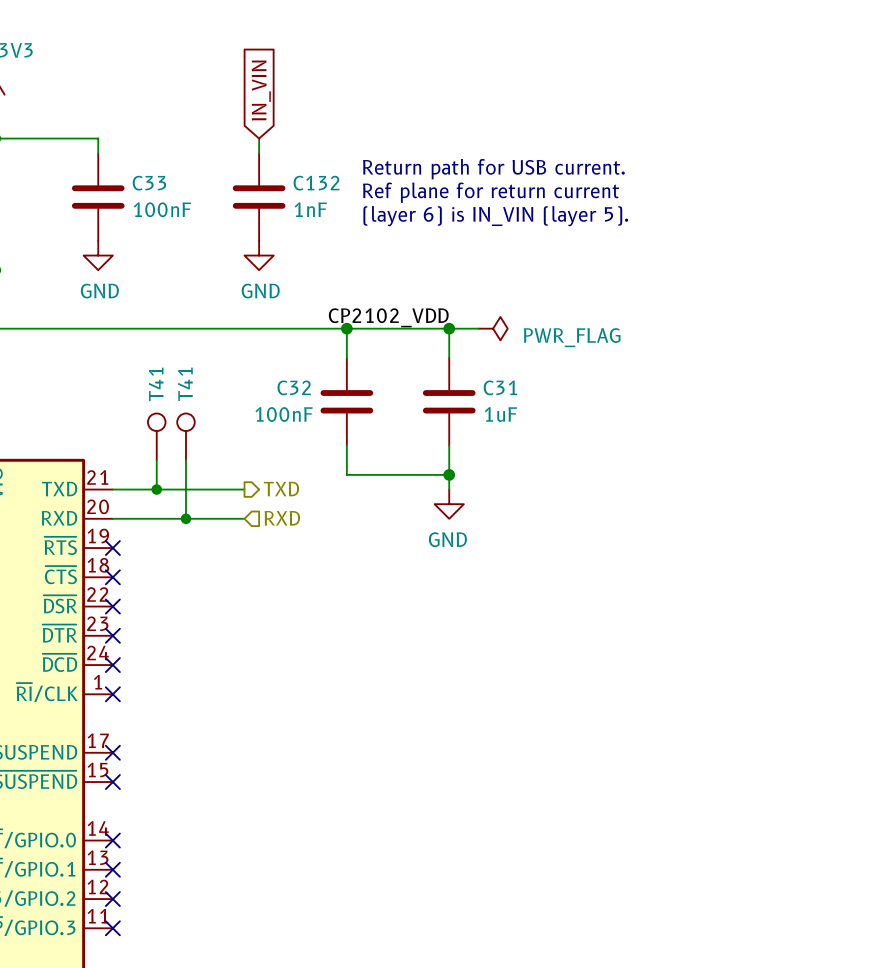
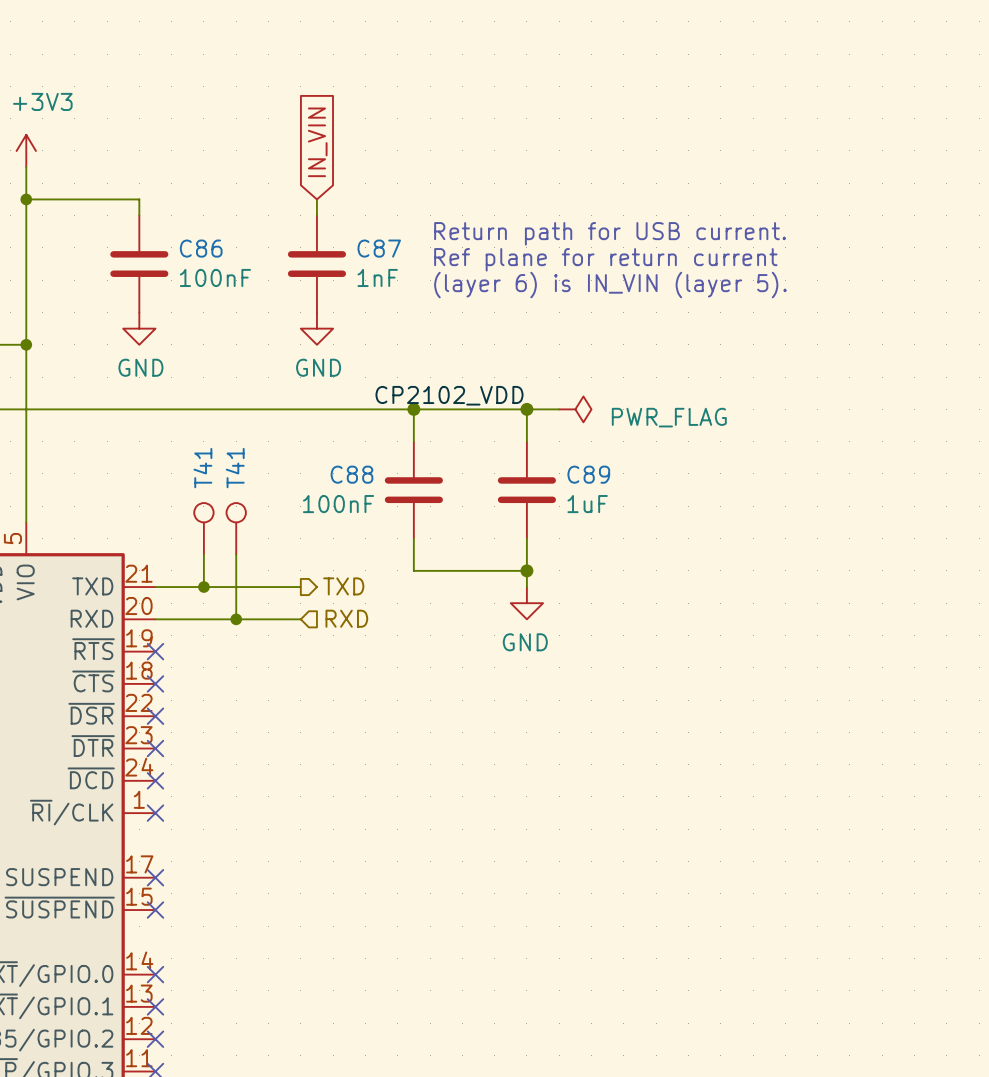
C33 name: C33 (149, 183) -> C86 (201, 248)
C132 name: C132 (316, 183) -> C87 (379, 248)
C32 name: C32 (294, 387) -> C88 (351, 474)
C31 name: C31 (500, 387) -> C89 (588, 474)

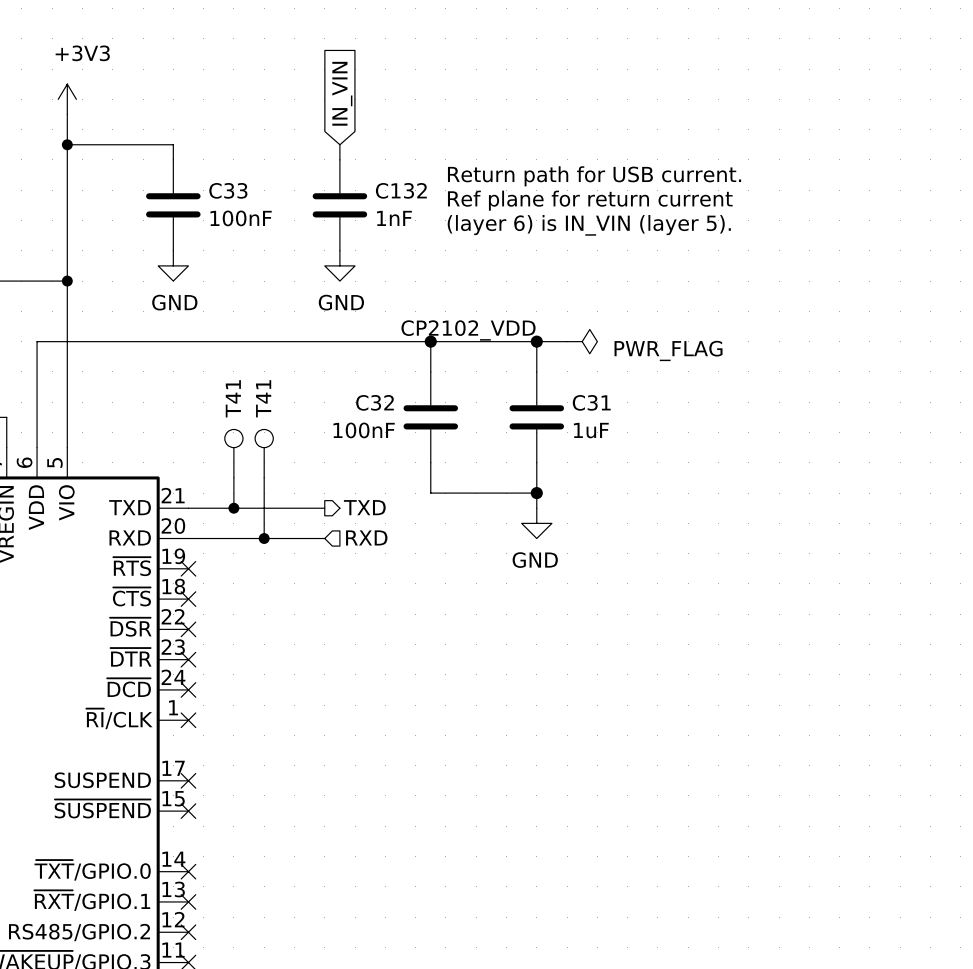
C86 name: C86 (201, 248) -> C33 (228, 190)
C87 name: C87 (379, 248) -> C132 (401, 190)
C88 name: C88 (351, 474) -> C32 (375, 402)
C89 name: C89 (588, 474) -> C31 (591, 402)

